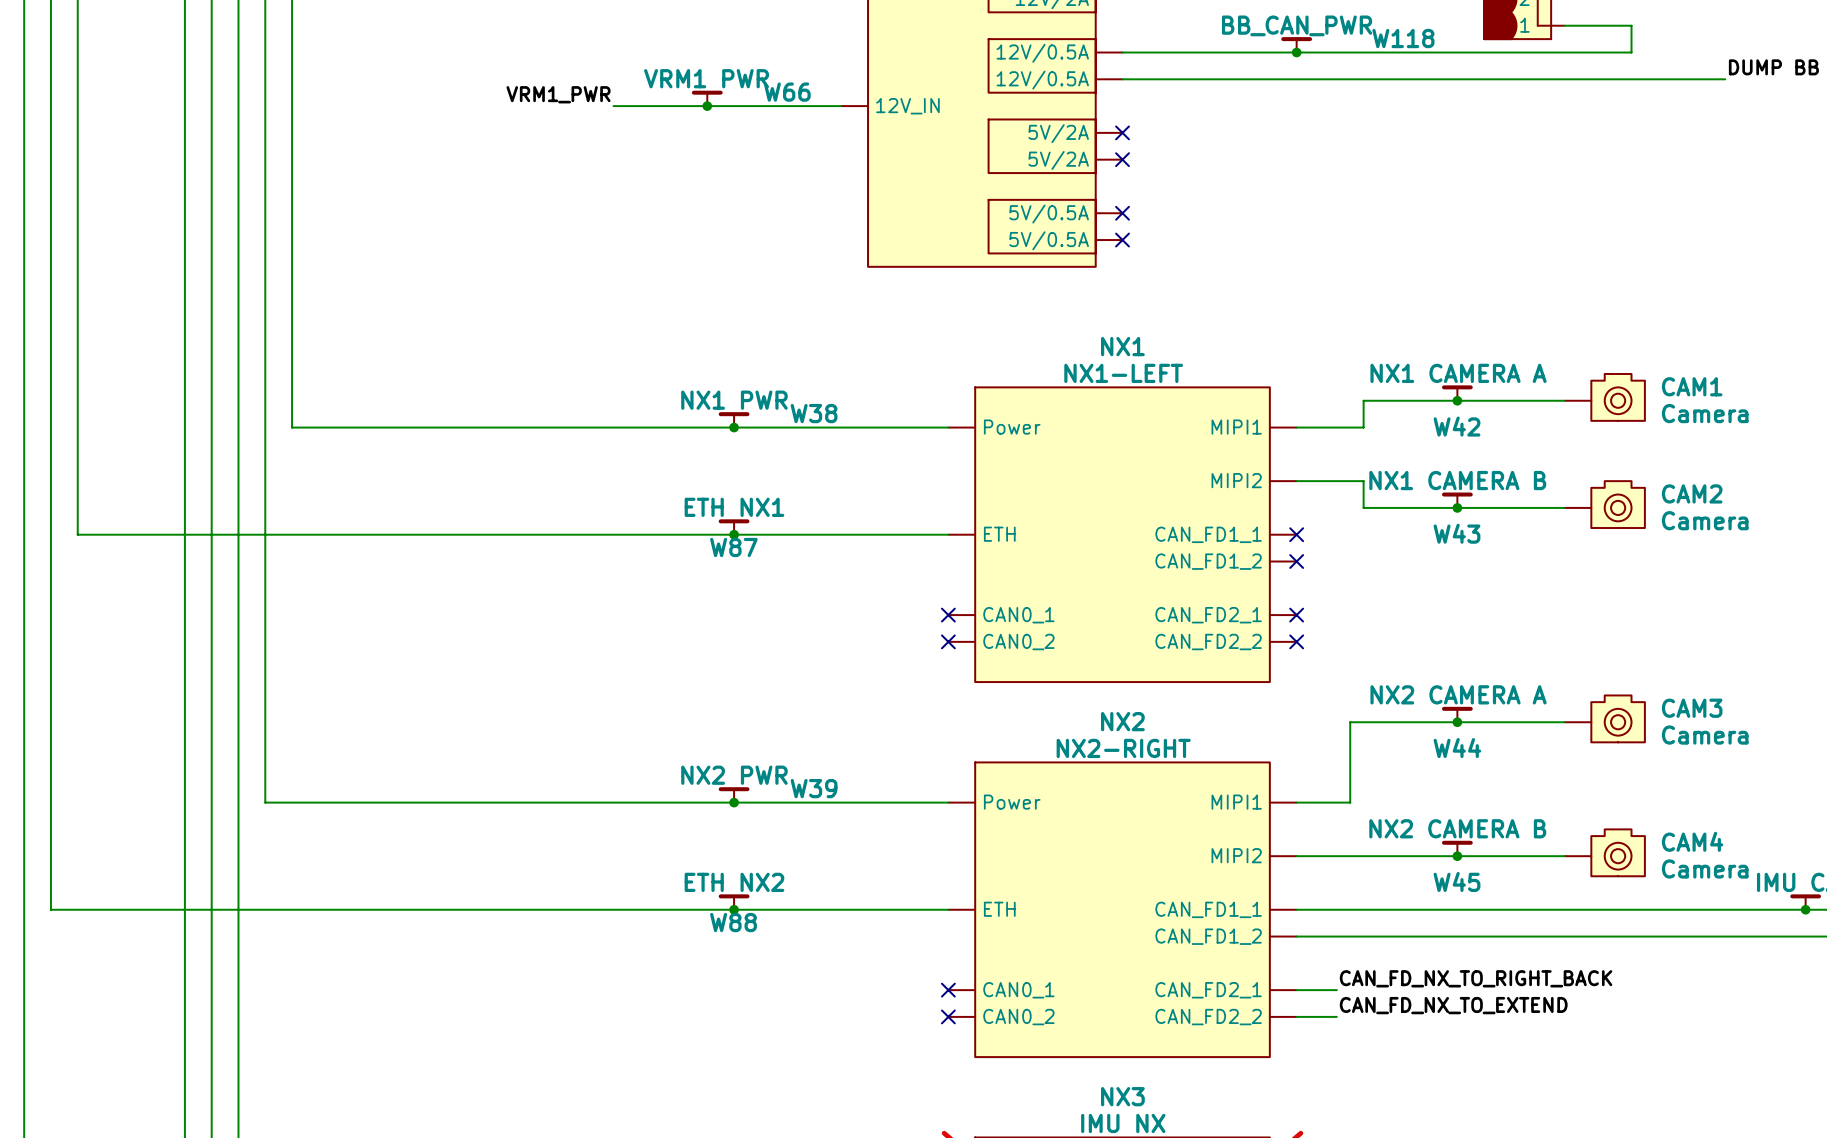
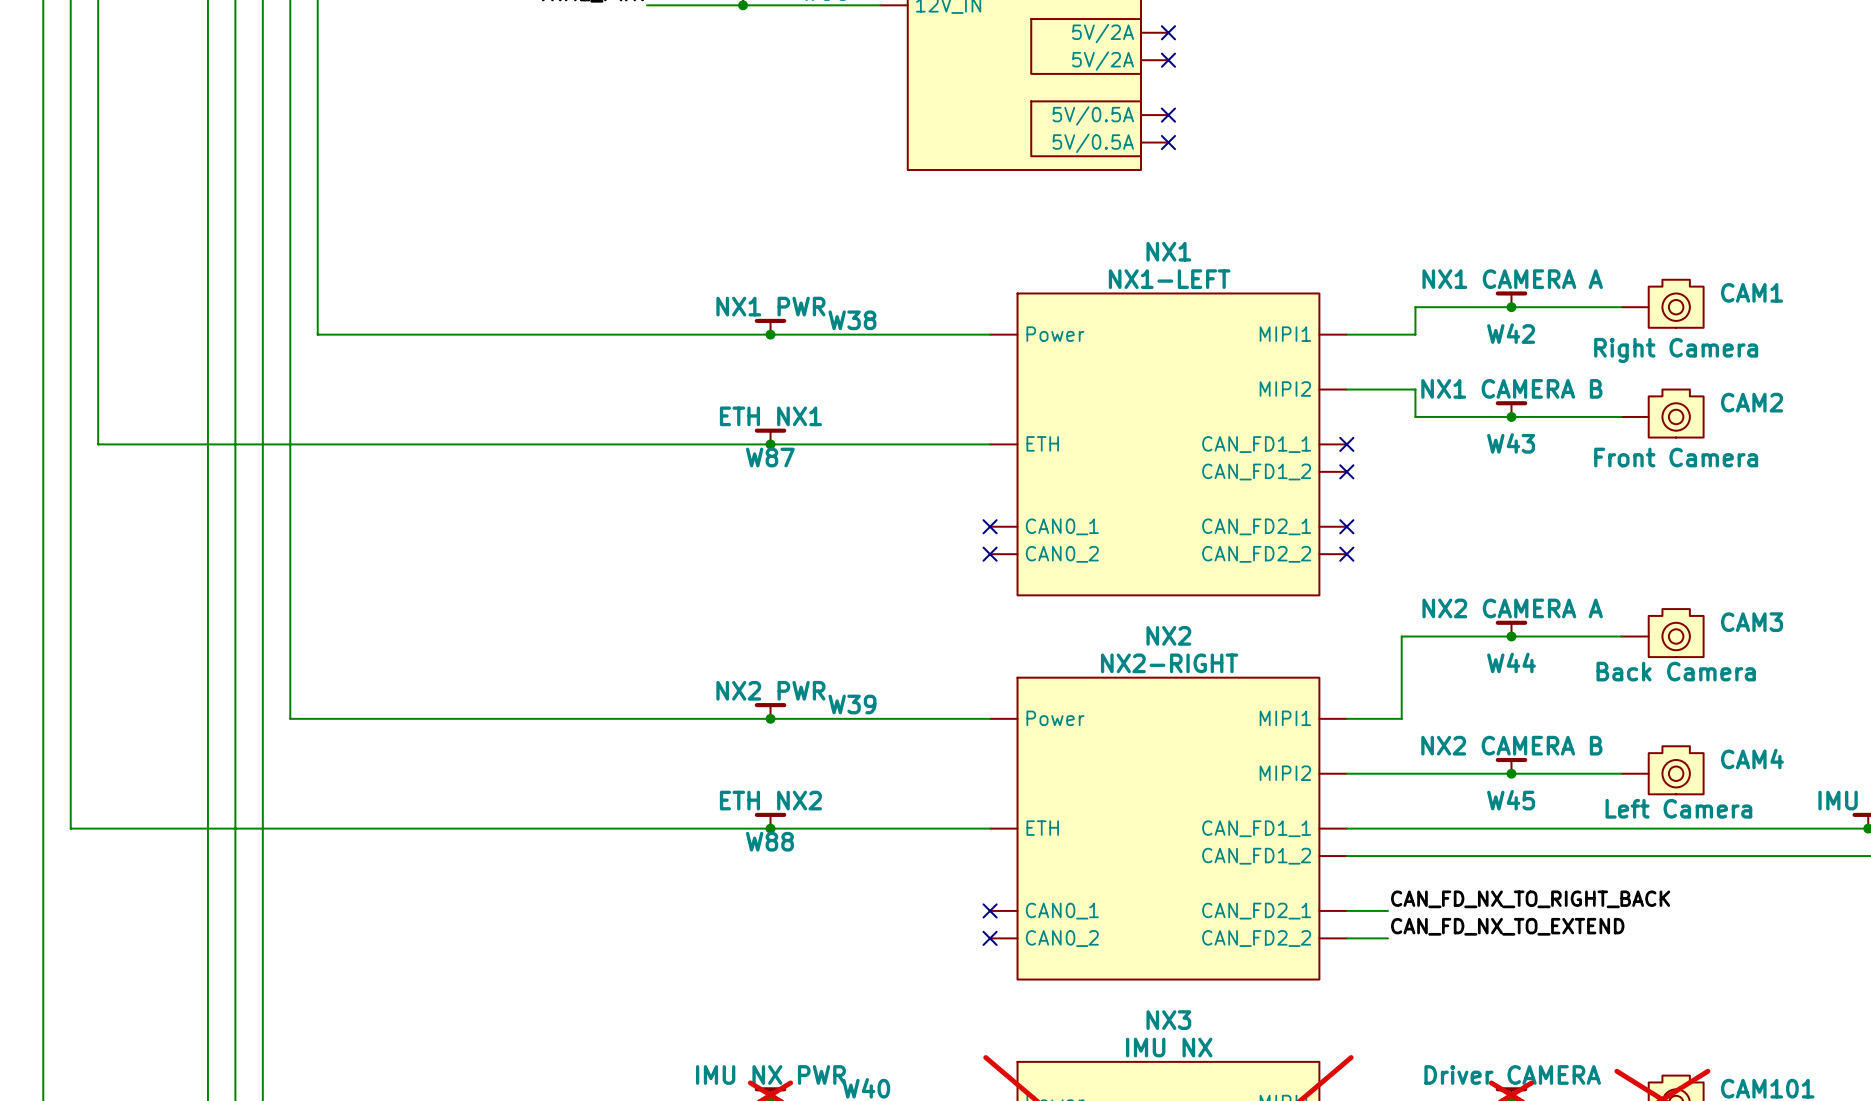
CAM1 value: Camera (1705, 413) -> Right Camera (1676, 350)
CAM2 value: Camera (1705, 520) -> Front Camera (1676, 457)
CAM3 value: Camera (1705, 735) -> Back Camera (1676, 671)
CAM4 value: Camera (1705, 868) -> Left Camera (1678, 808)

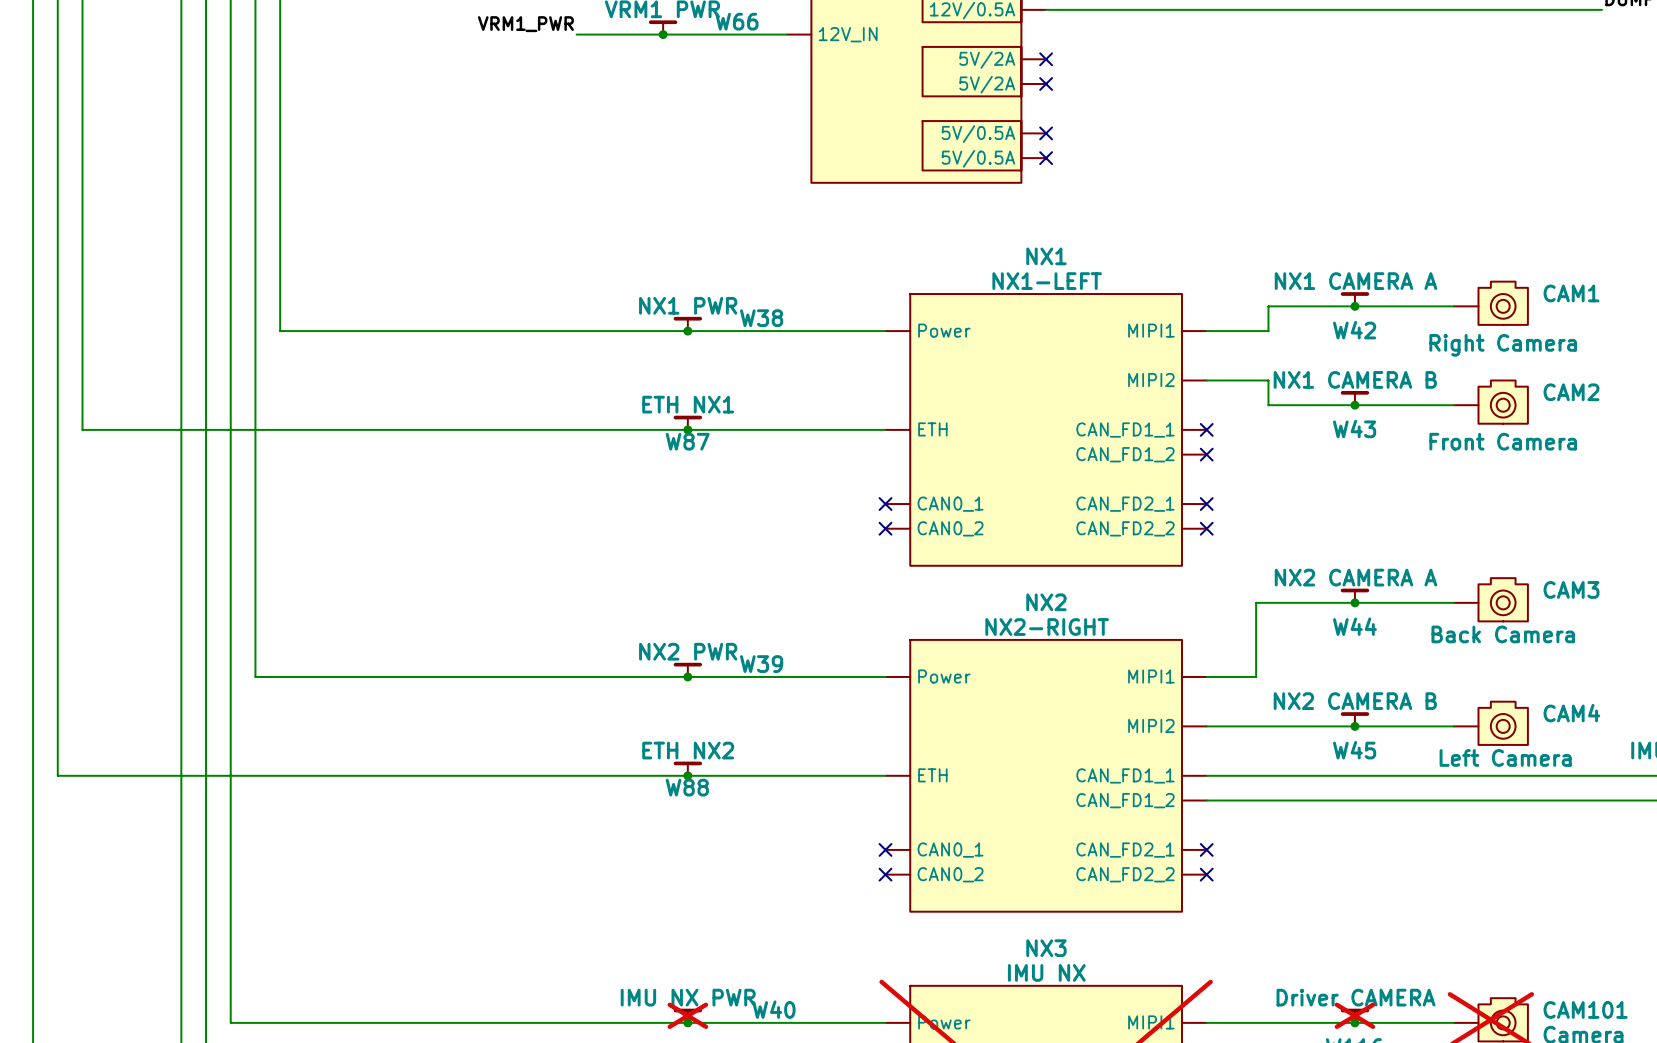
label: CAN_FD_NX_TO_RIGHT_BACK (1530, 899) -> none
wire: (1346, 910) (1388, 910) -> none
no-connect mark: none -> (1206, 849)
label: CAN_FD_NX_TO_EXTEND (1507, 926) -> none
wire: (1346, 938) (1388, 938) -> none
no-connect mark: none -> (1206, 874)

